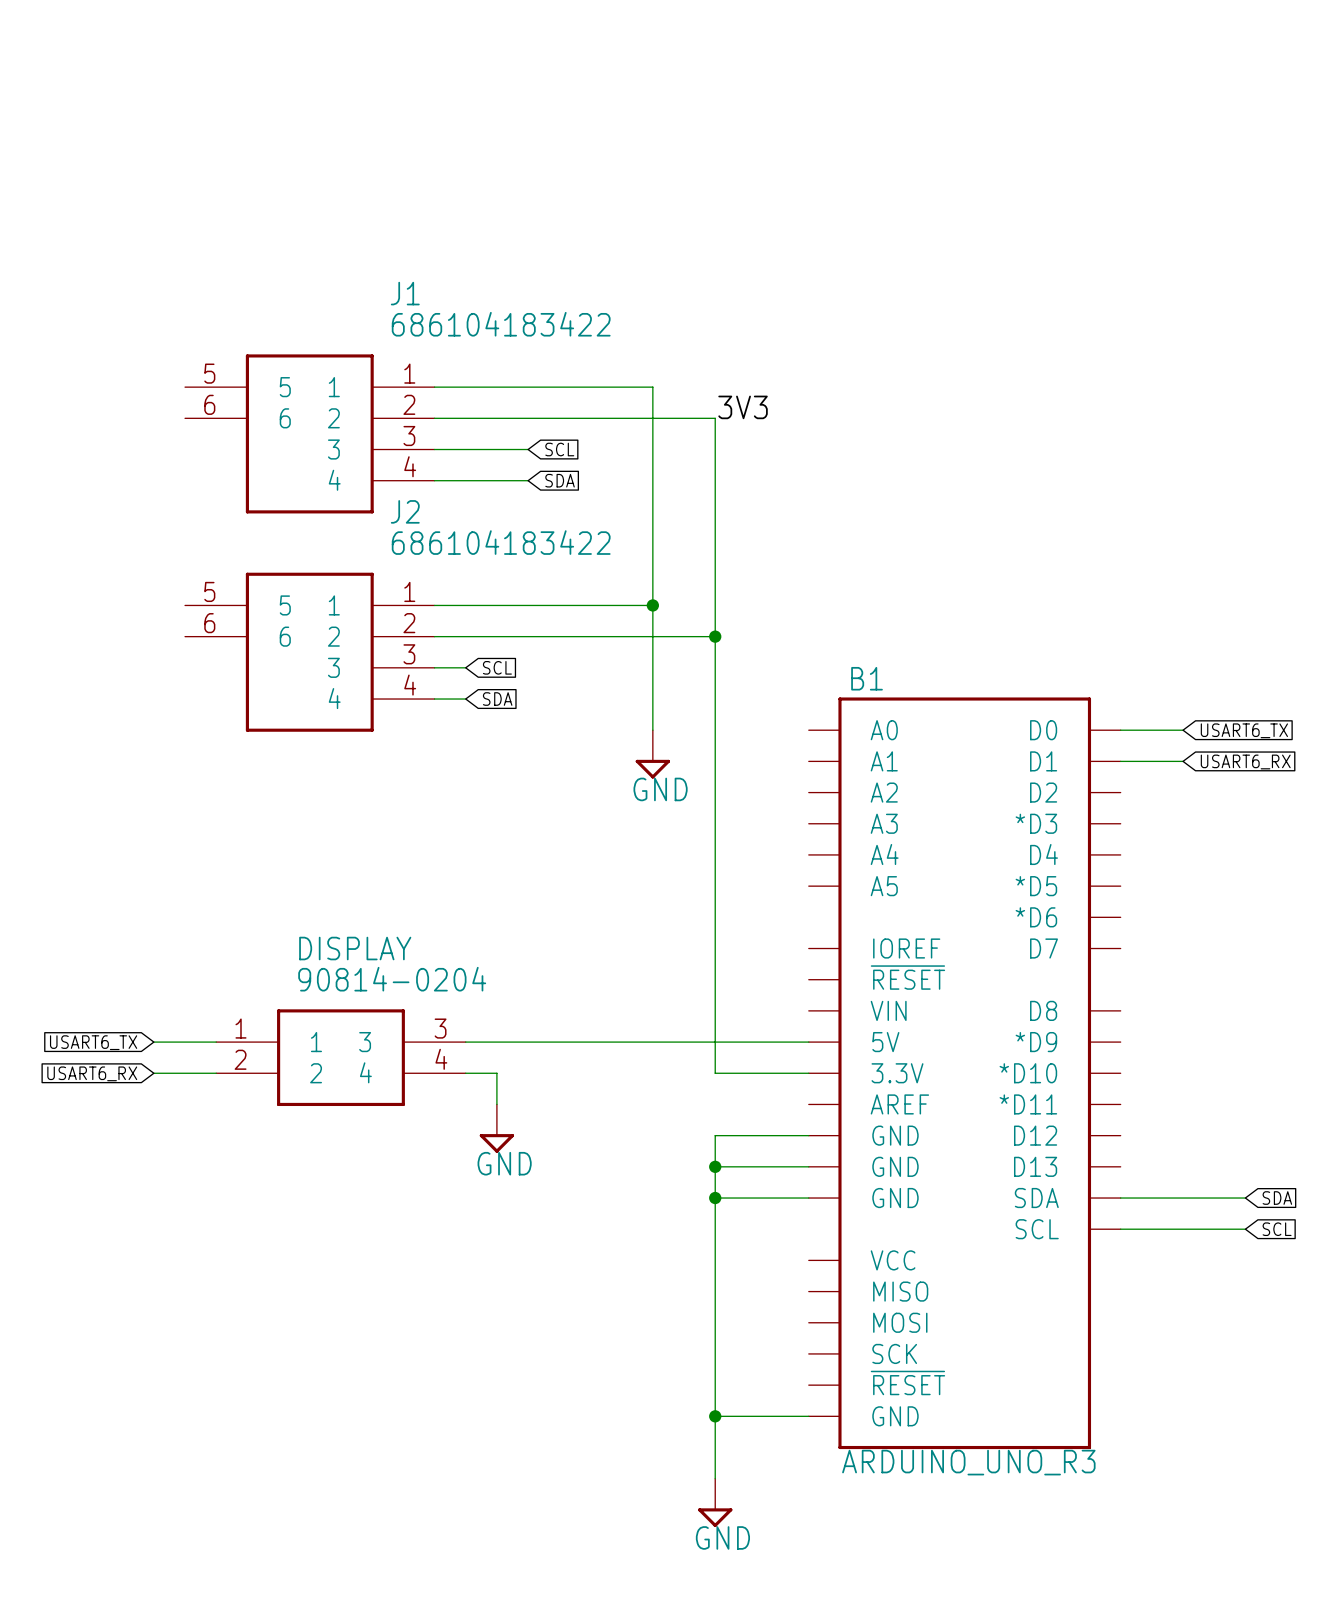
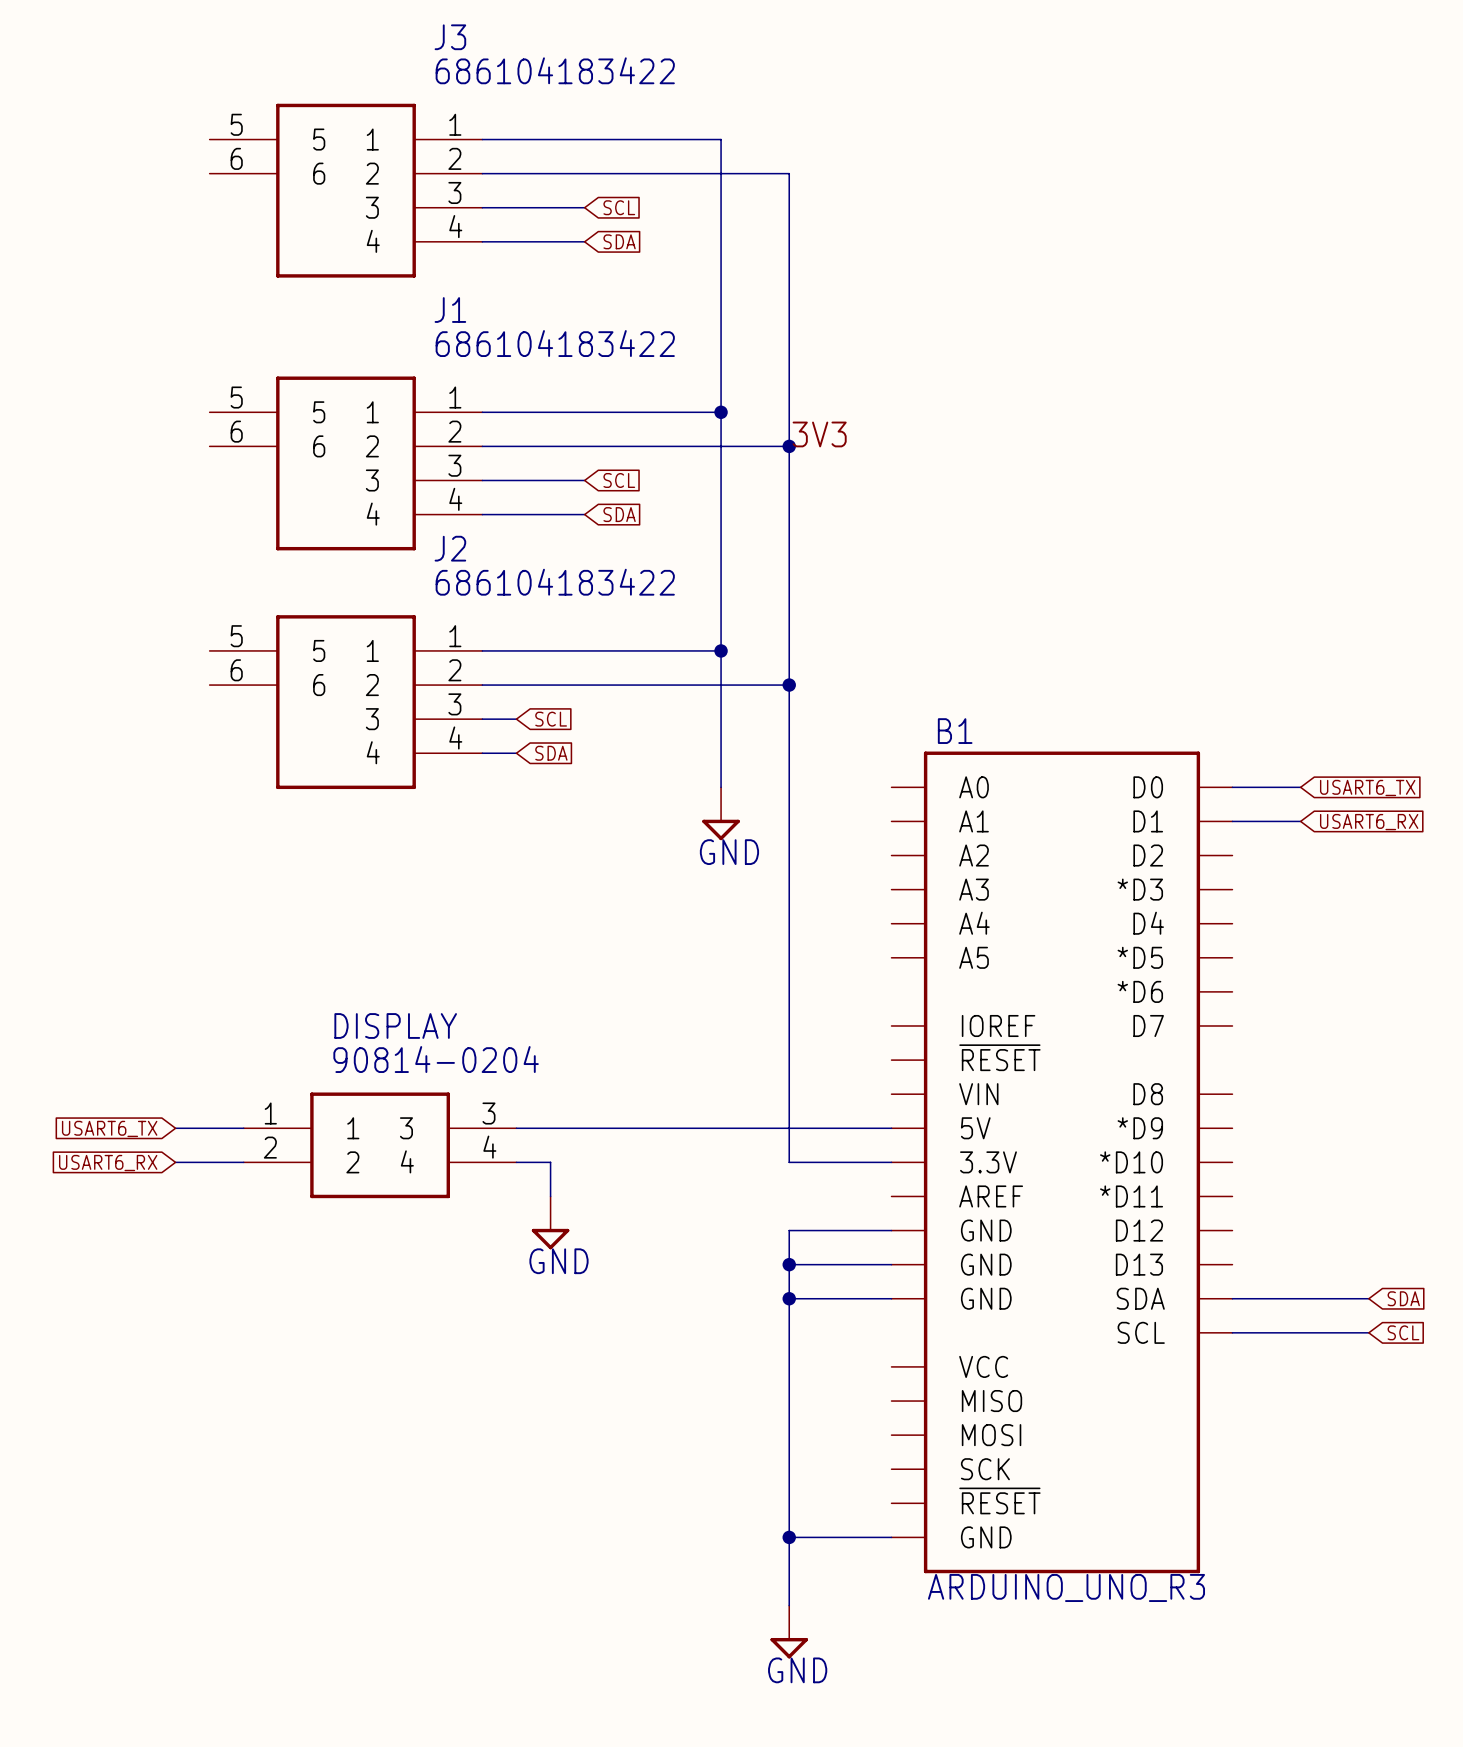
wire: none -> (482, 139) (721, 139) (721, 412)
wire: none -> (482, 173) (789, 173) (789, 446)
J3: none -> 686104183422 (346, 190)
wire: none -> (482, 207) (584, 207)
global label: none -> SCL (619, 207)
wire: none -> (482, 241) (584, 241)
global label: none -> SDA (619, 241)
junction: none -> (721, 412)
junction: none -> (789, 446)

